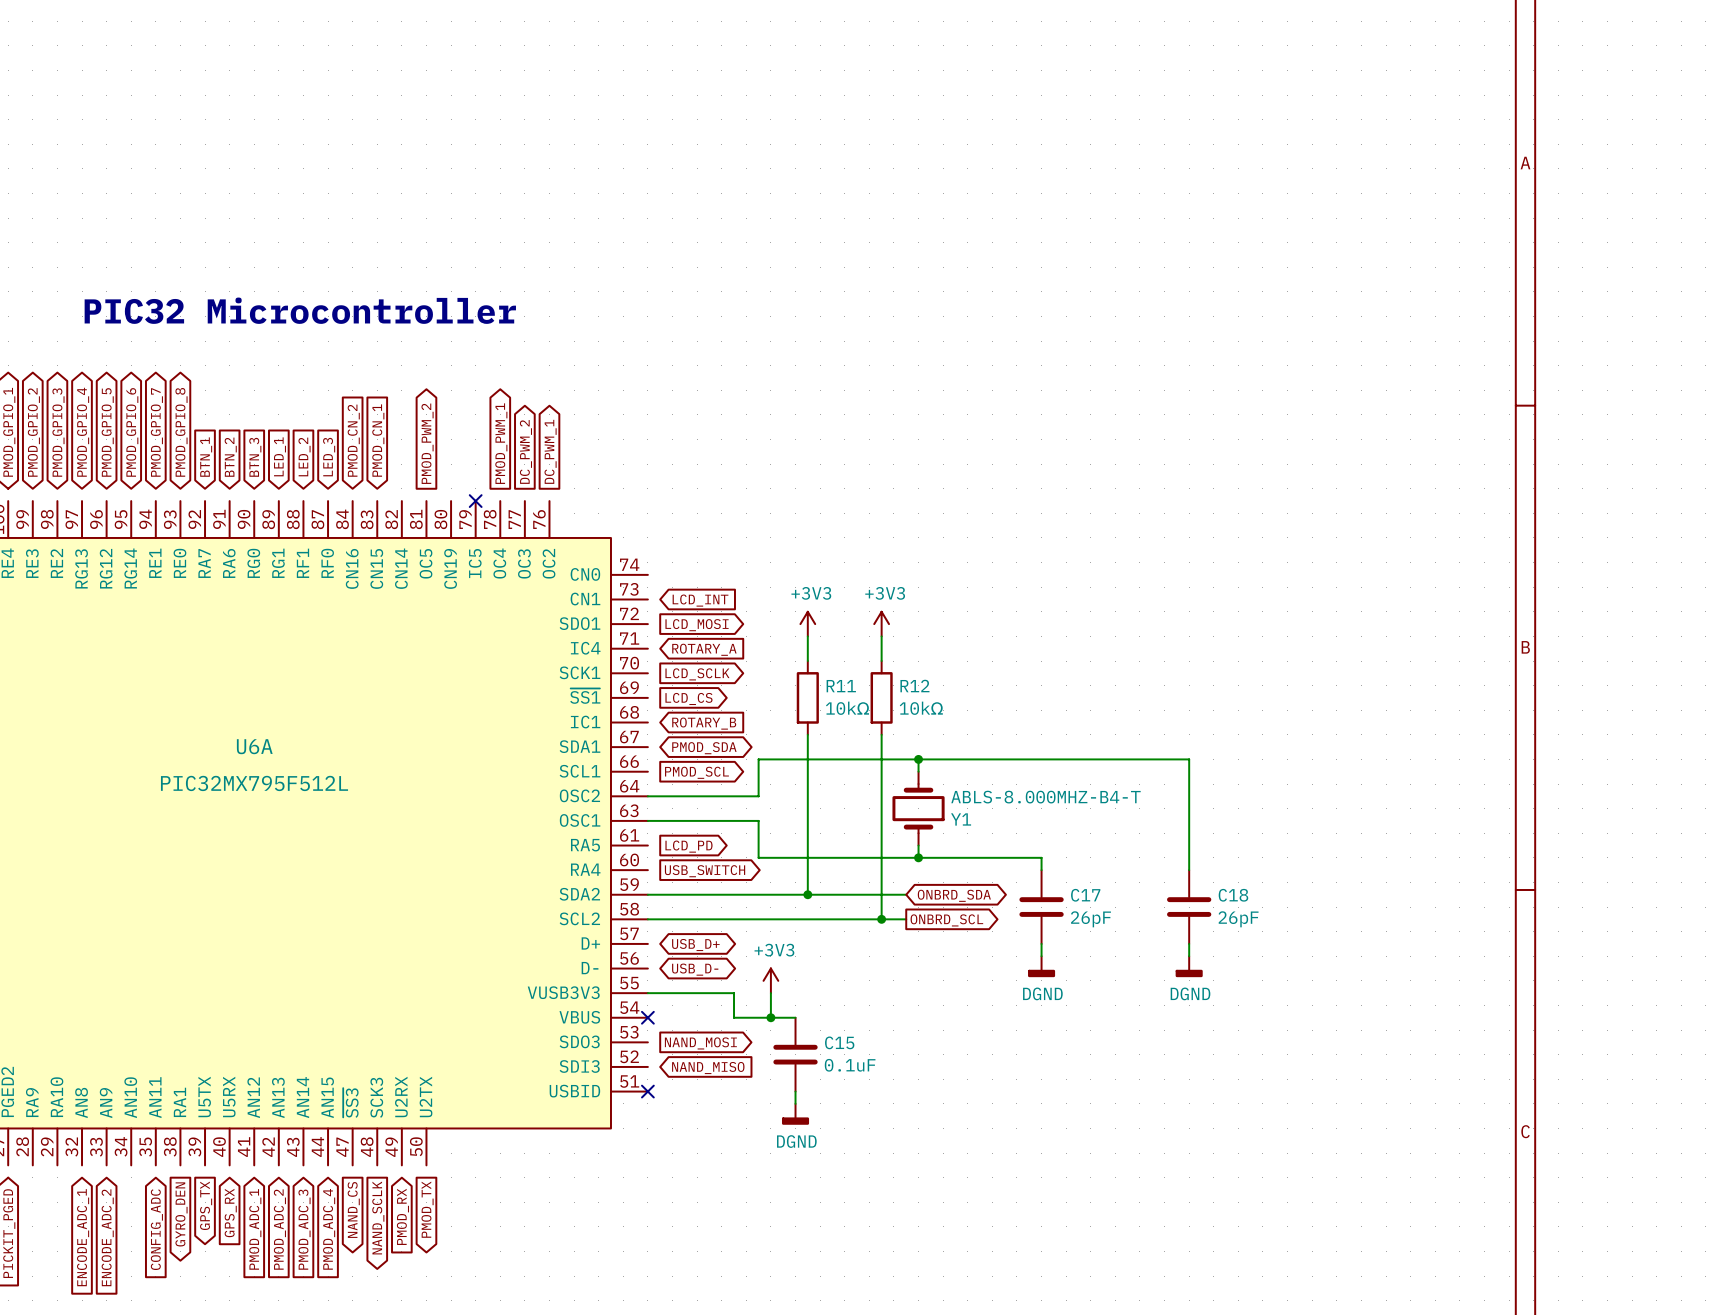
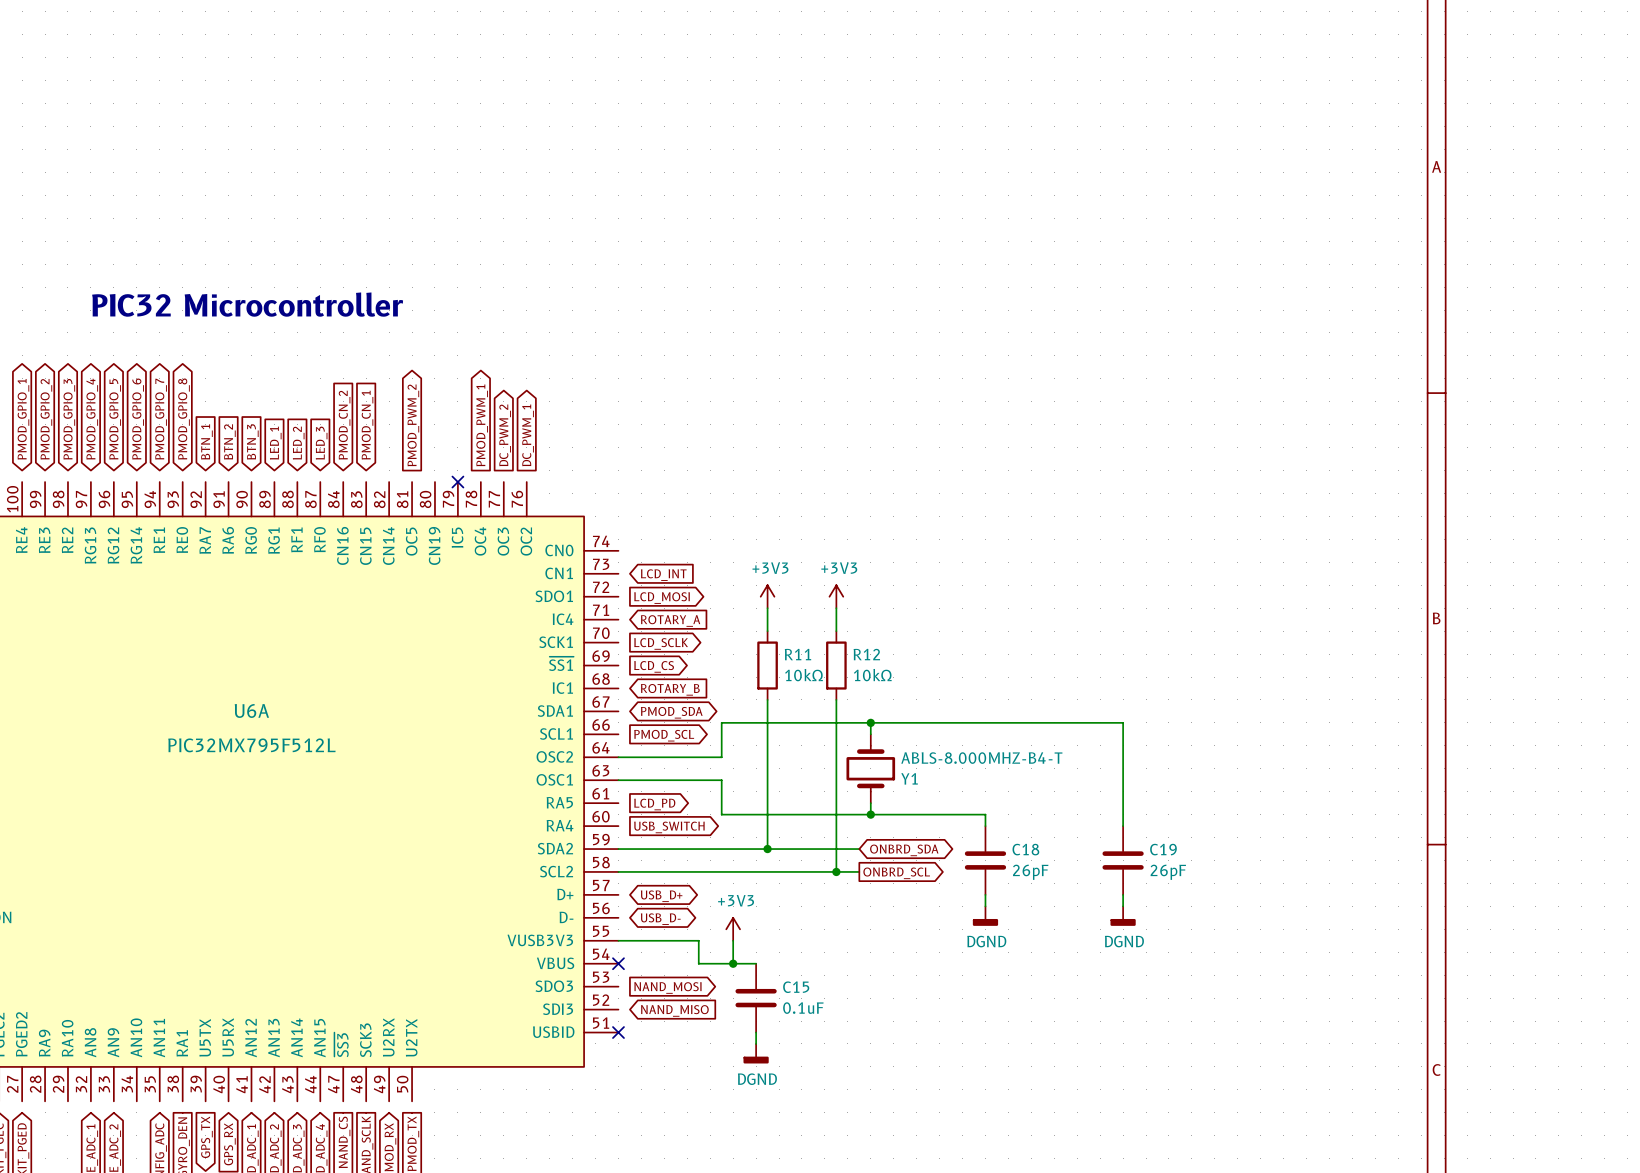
C17 name: C17 (1085, 895) -> C18 (1025, 849)
C18 name: C18 (1233, 895) -> C19 (1163, 849)

